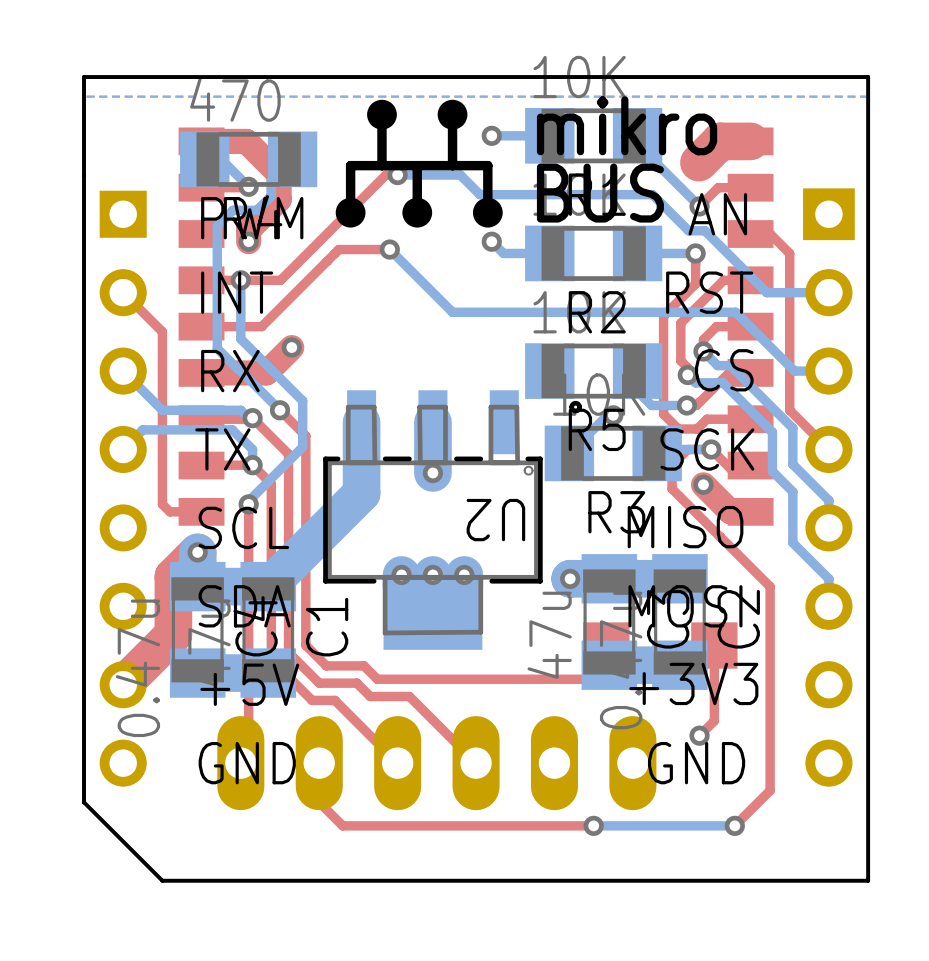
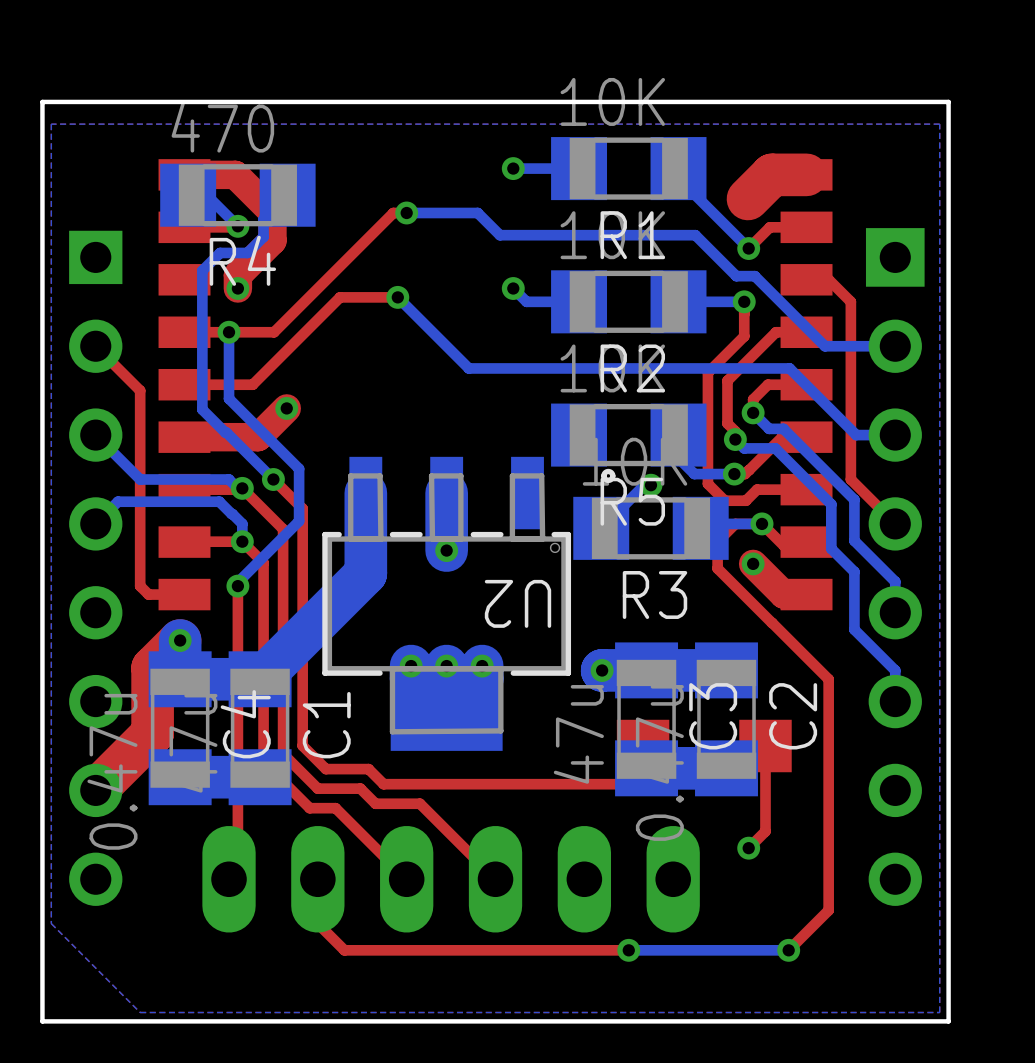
part footprint: [82, 75, 871, 883] -> [40, 99, 951, 1024]

